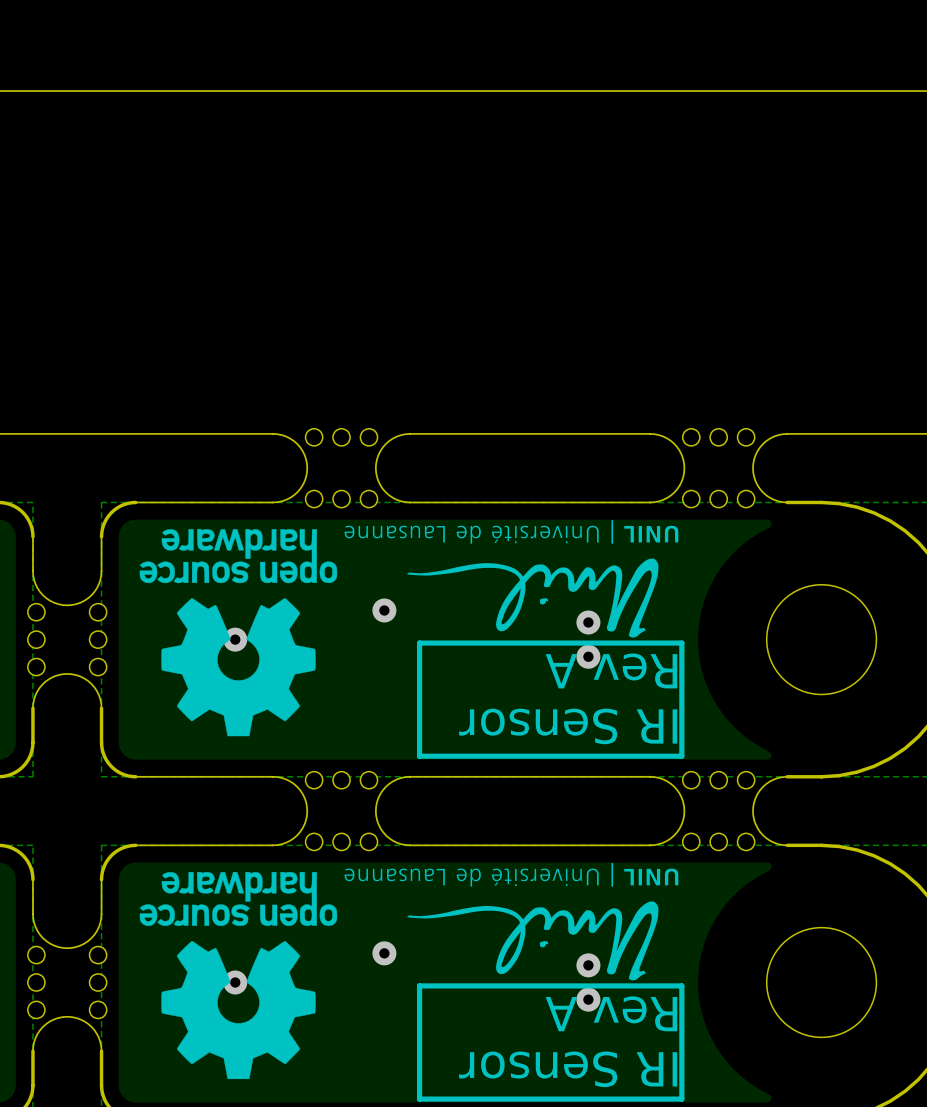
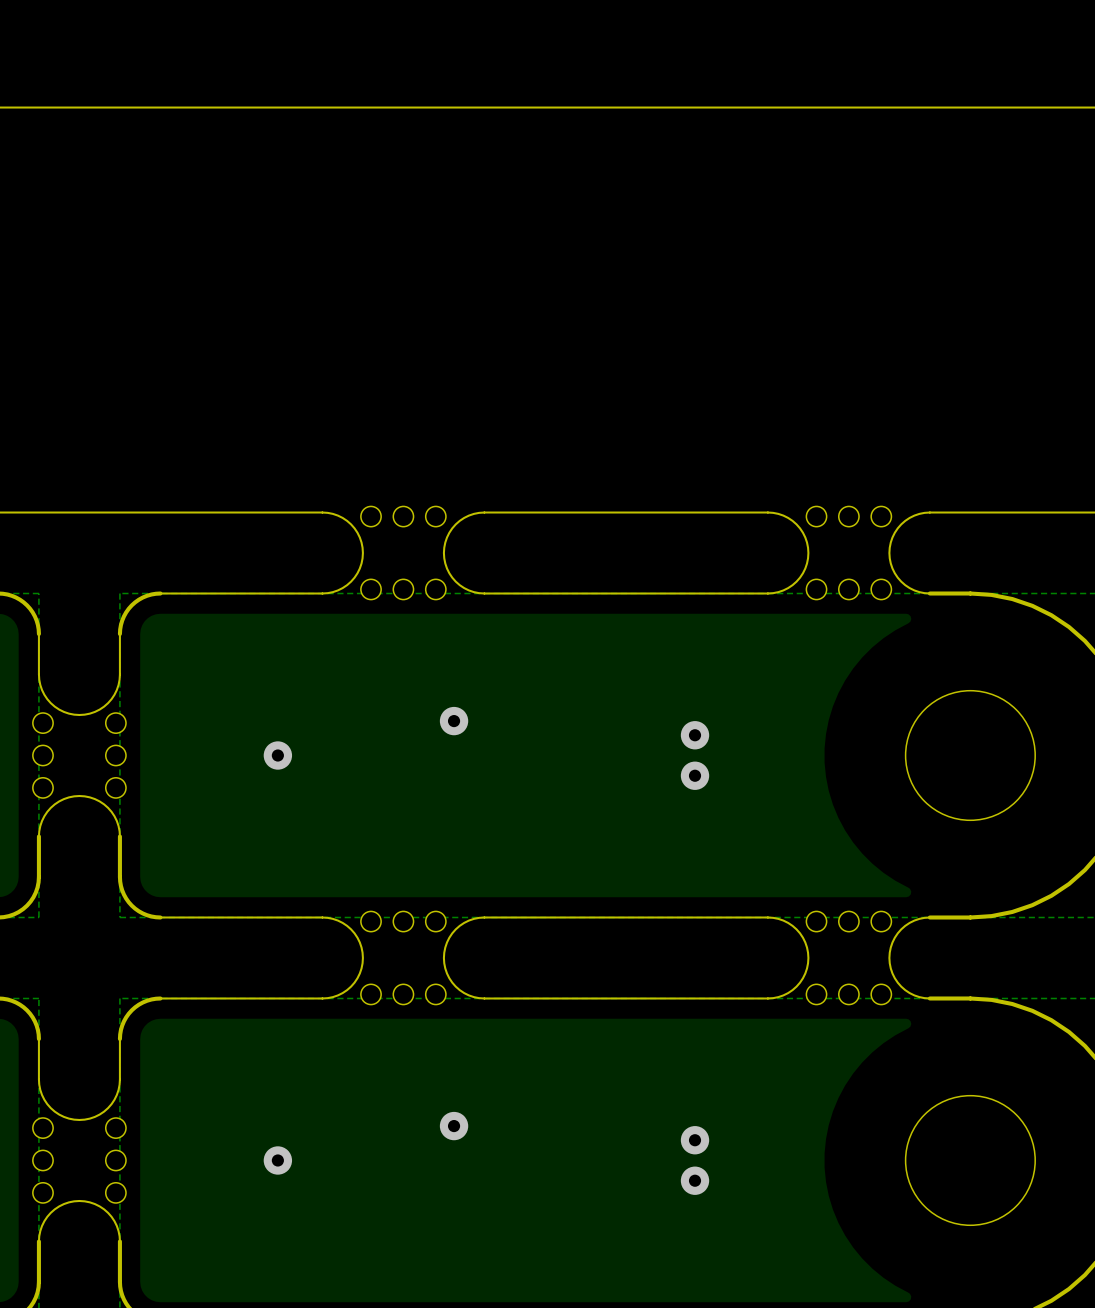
drawing: [139, 520, 679, 737] -> none
line: (681, 643) (681, 756) (419, 756) (419, 643) (681, 643) -> none
text: Rev A (611, 670) -> none
text: IR Sensor (568, 726) -> none
drawing: [139, 863, 679, 1080] -> none
line: (681, 985) (681, 1099) (419, 1099) (419, 985) (681, 985) -> none
text: Rev A (611, 1013) -> none
text: IR Sensor (568, 1069) -> none

